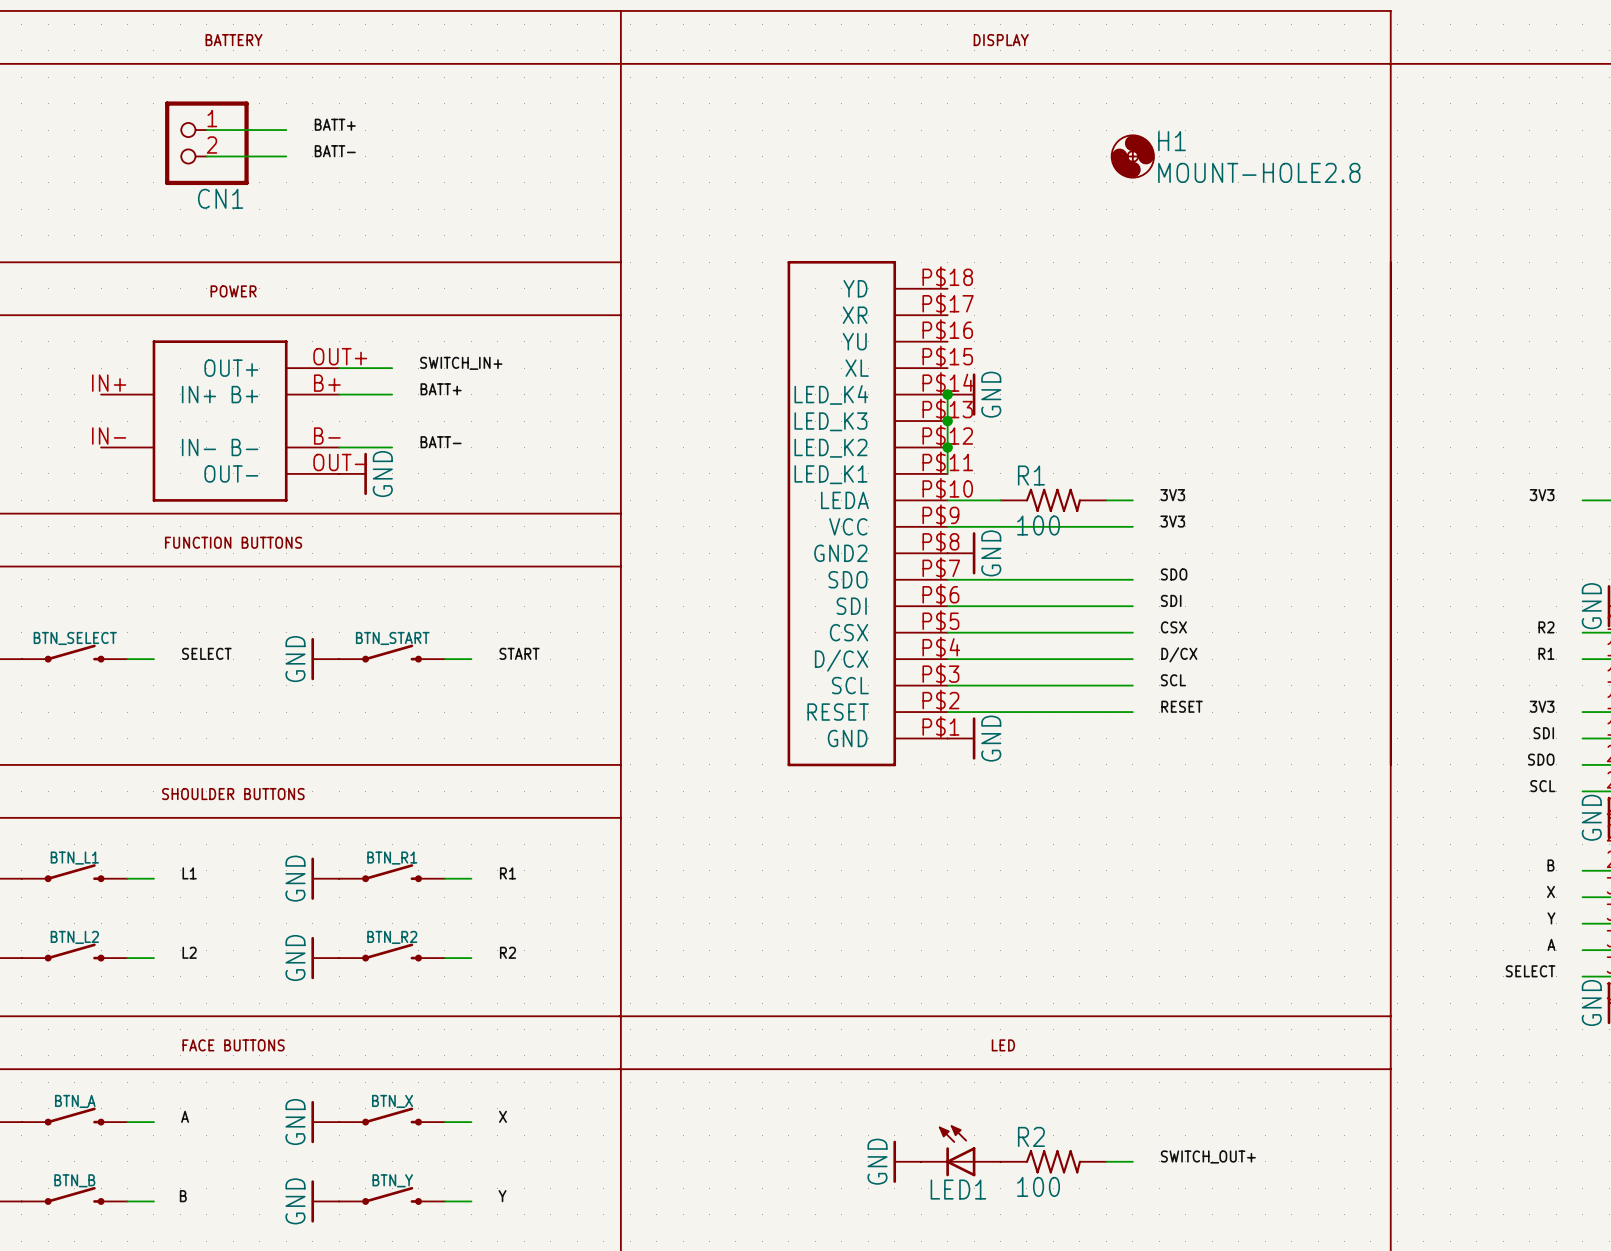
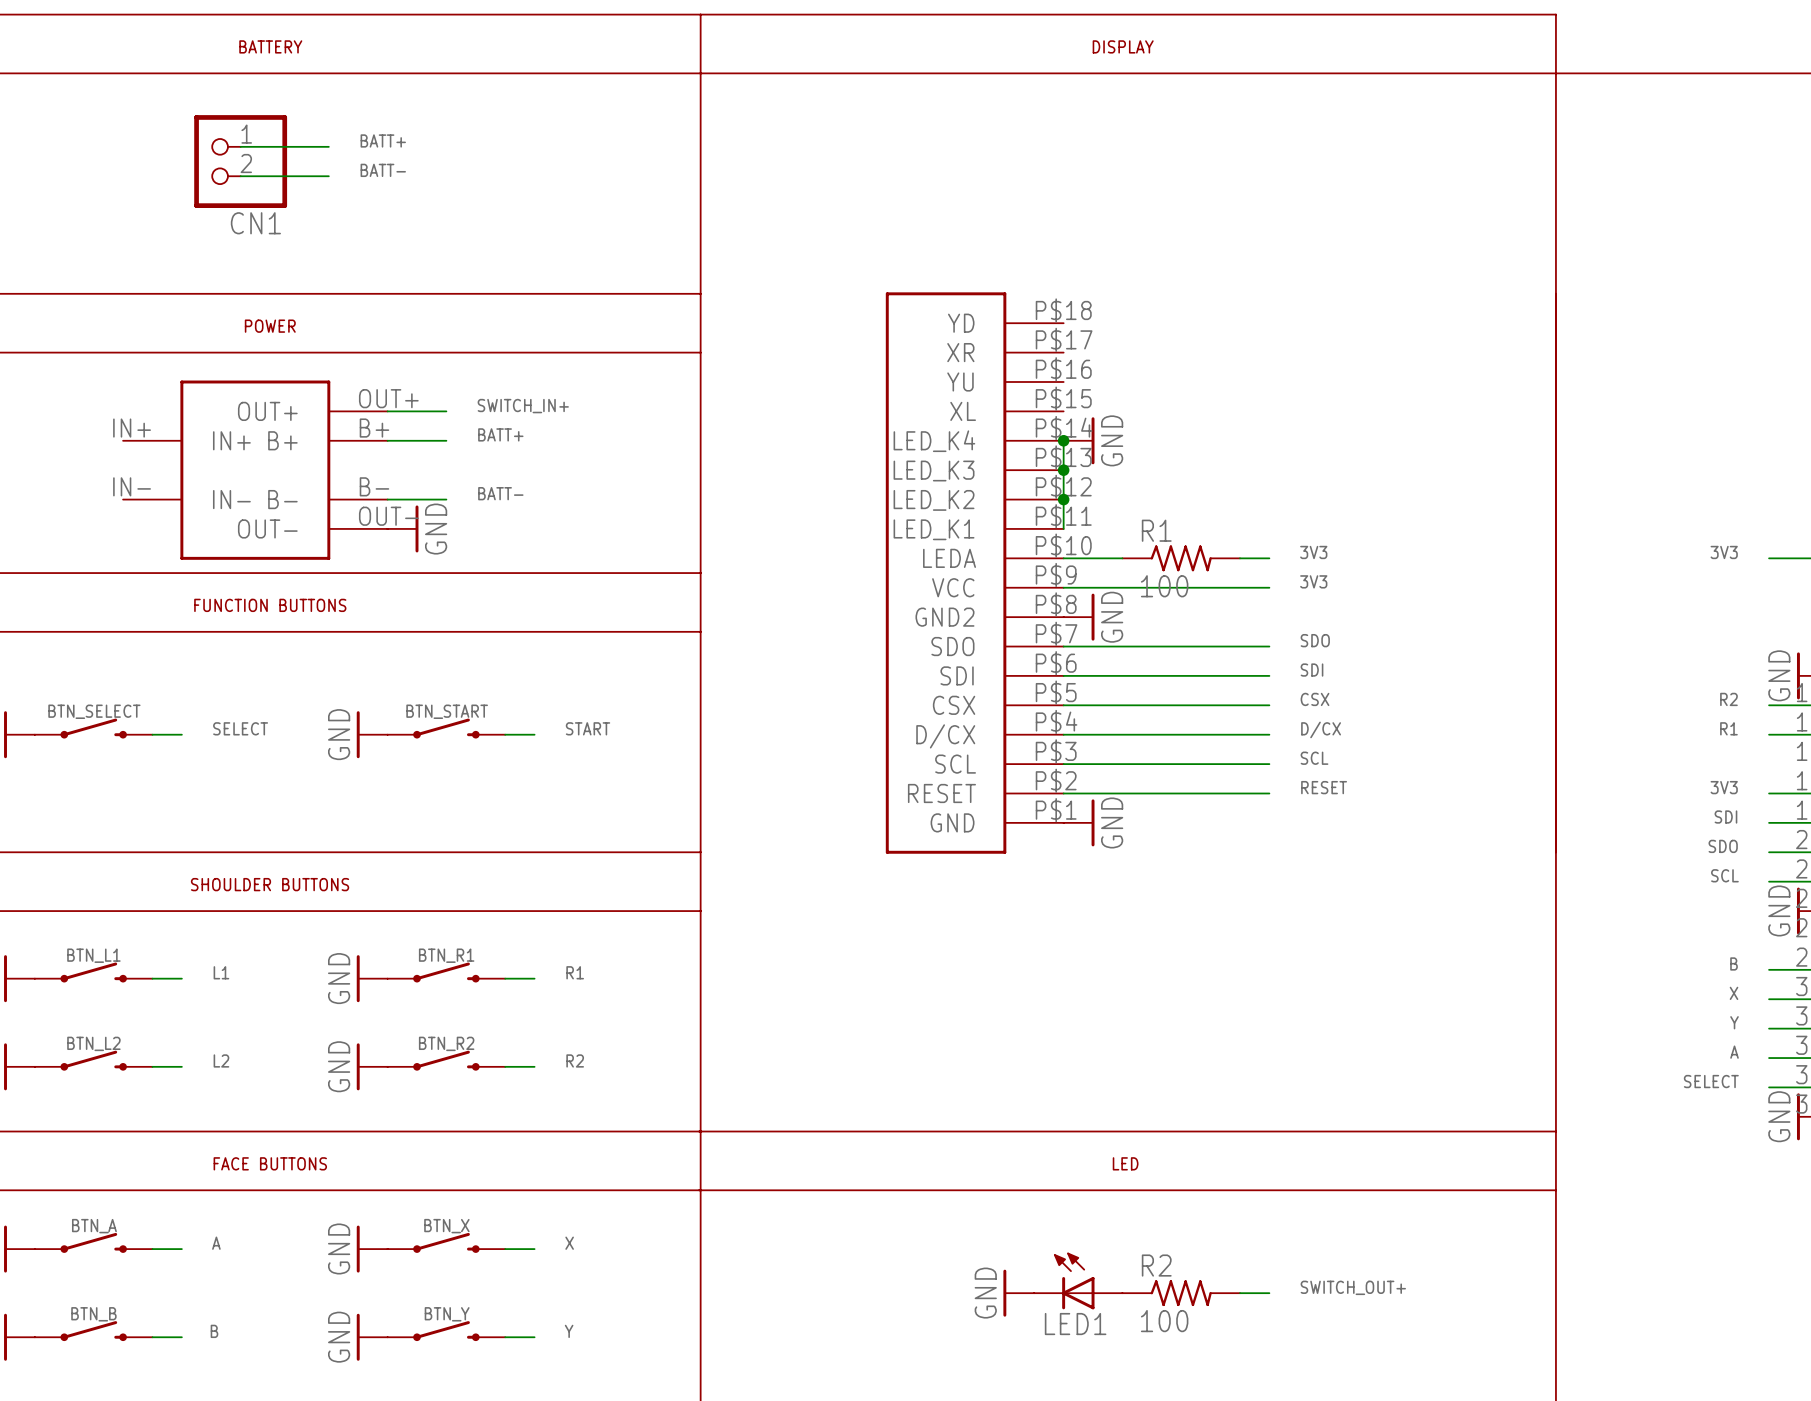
H1: MOUNT-HOLE2.8 (1132, 156) -> none

